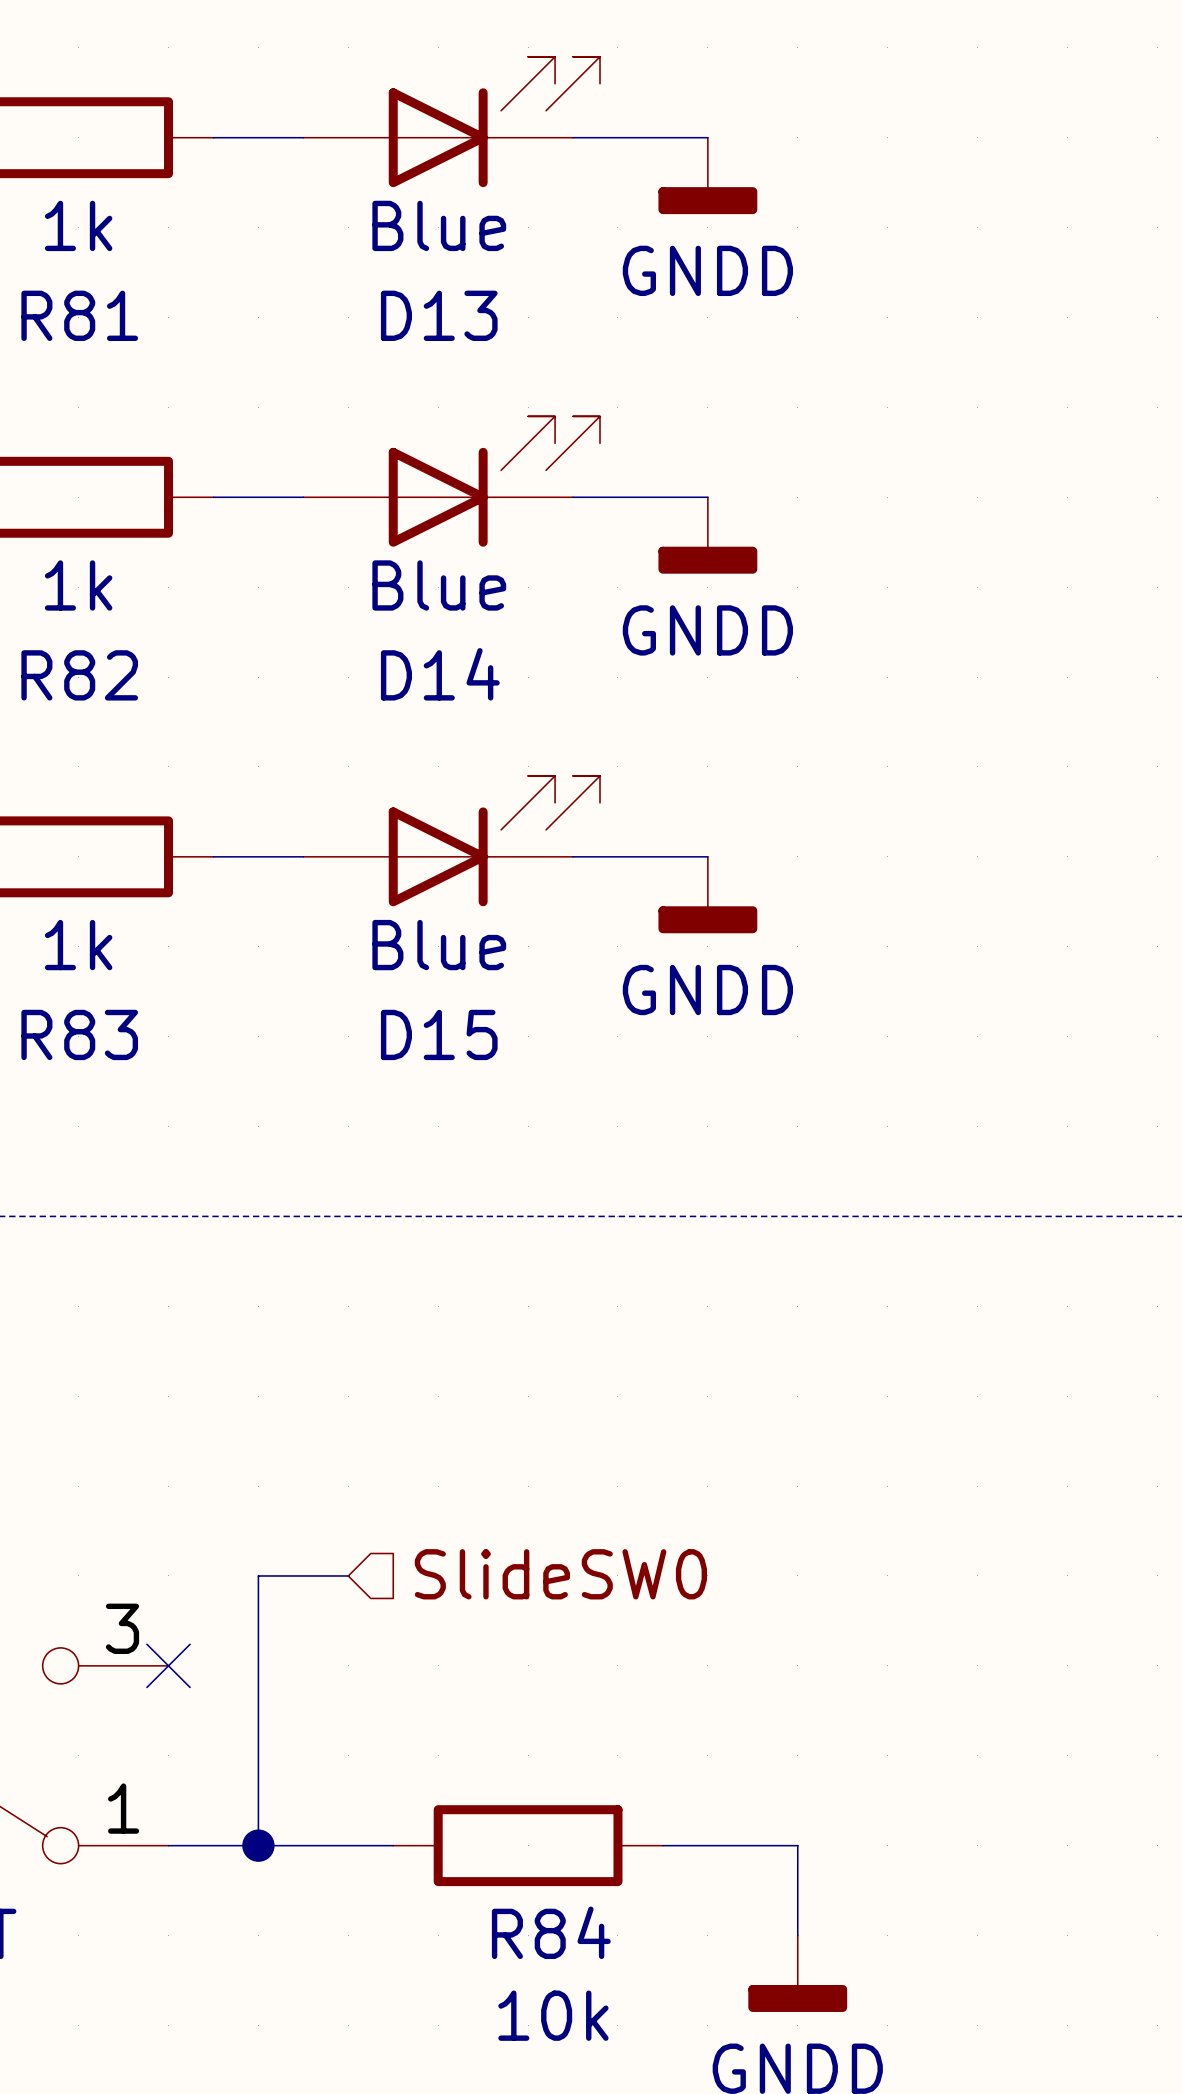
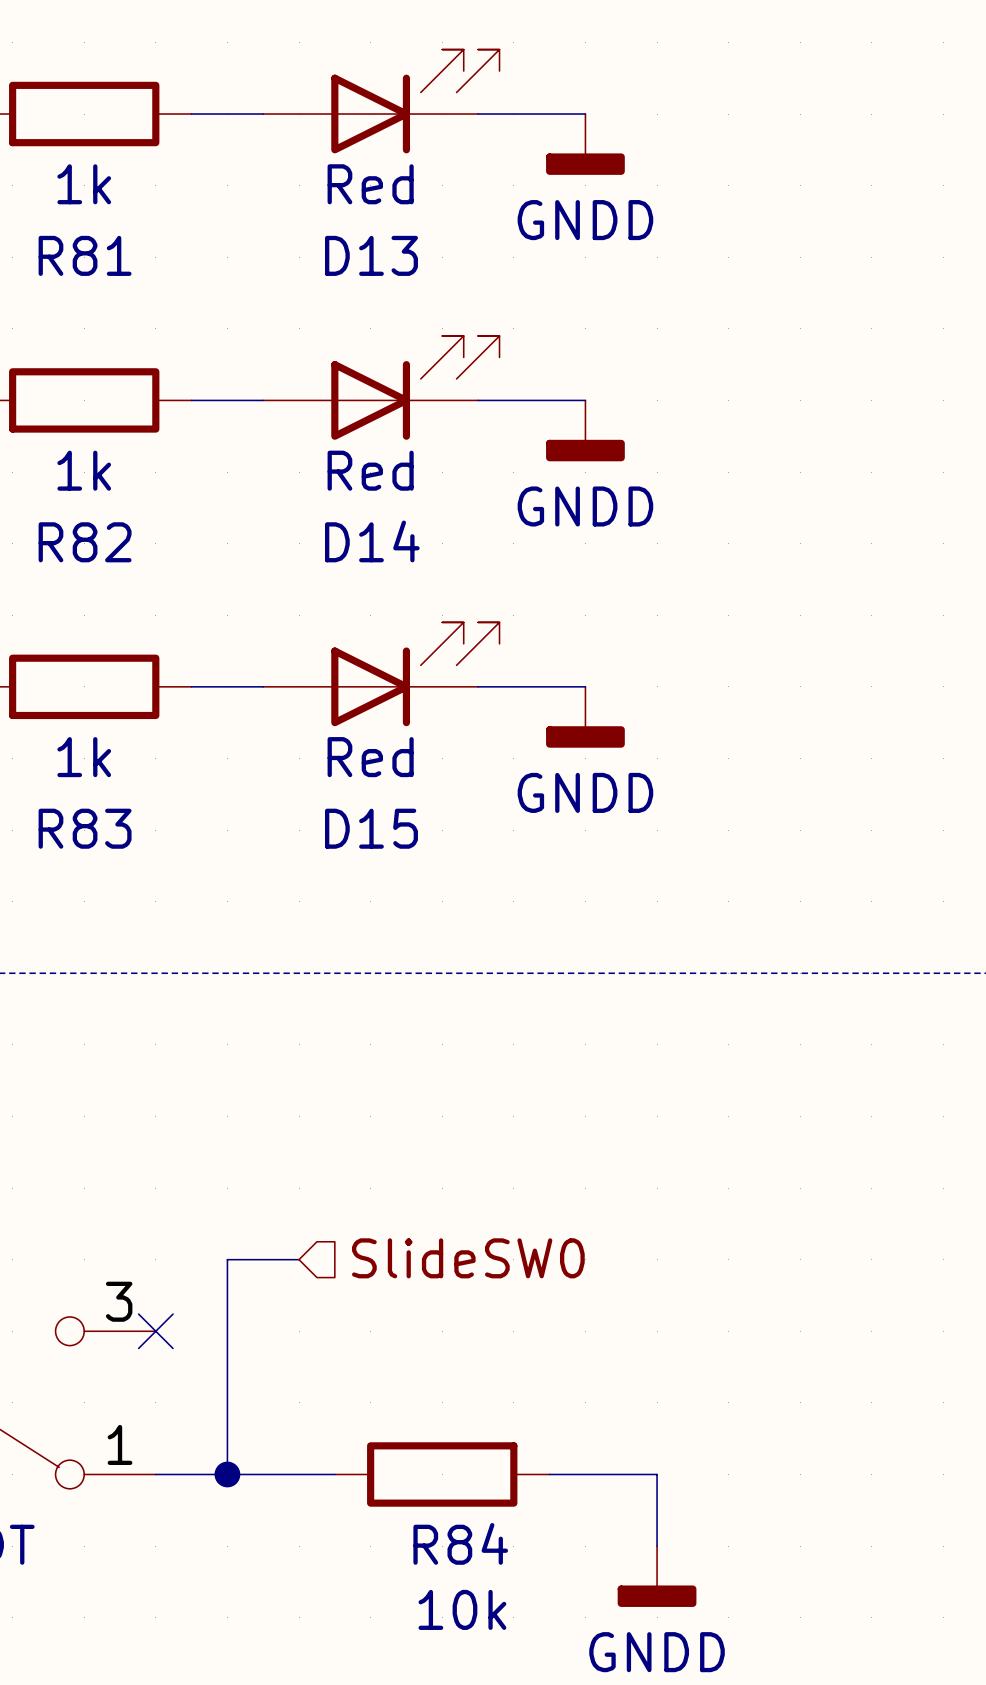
D13 value: Blue (439, 225) -> Red (370, 184)
D14 value: Blue (439, 585) -> Red (370, 470)
D15 value: Blue (439, 945) -> Red (370, 757)

